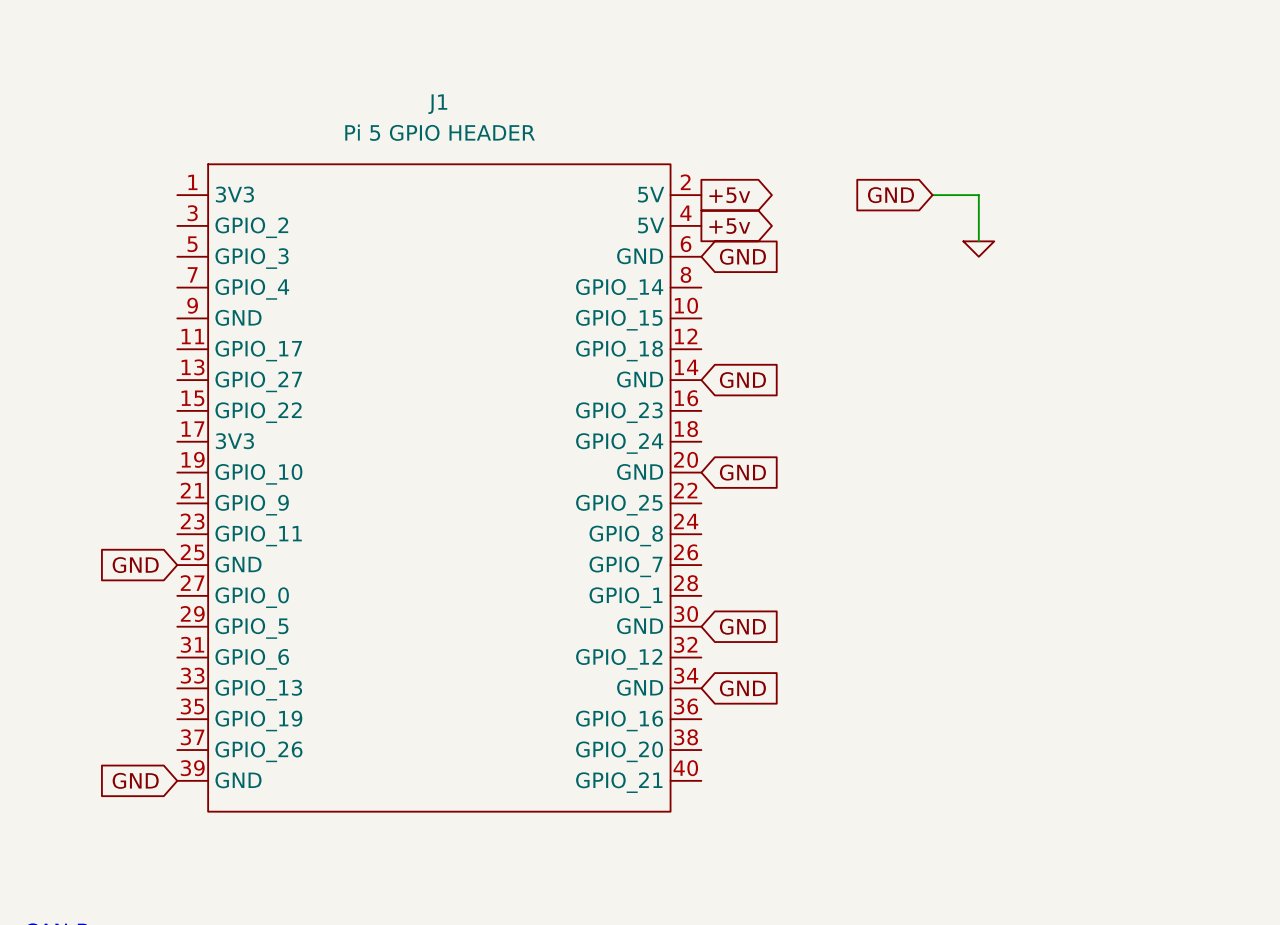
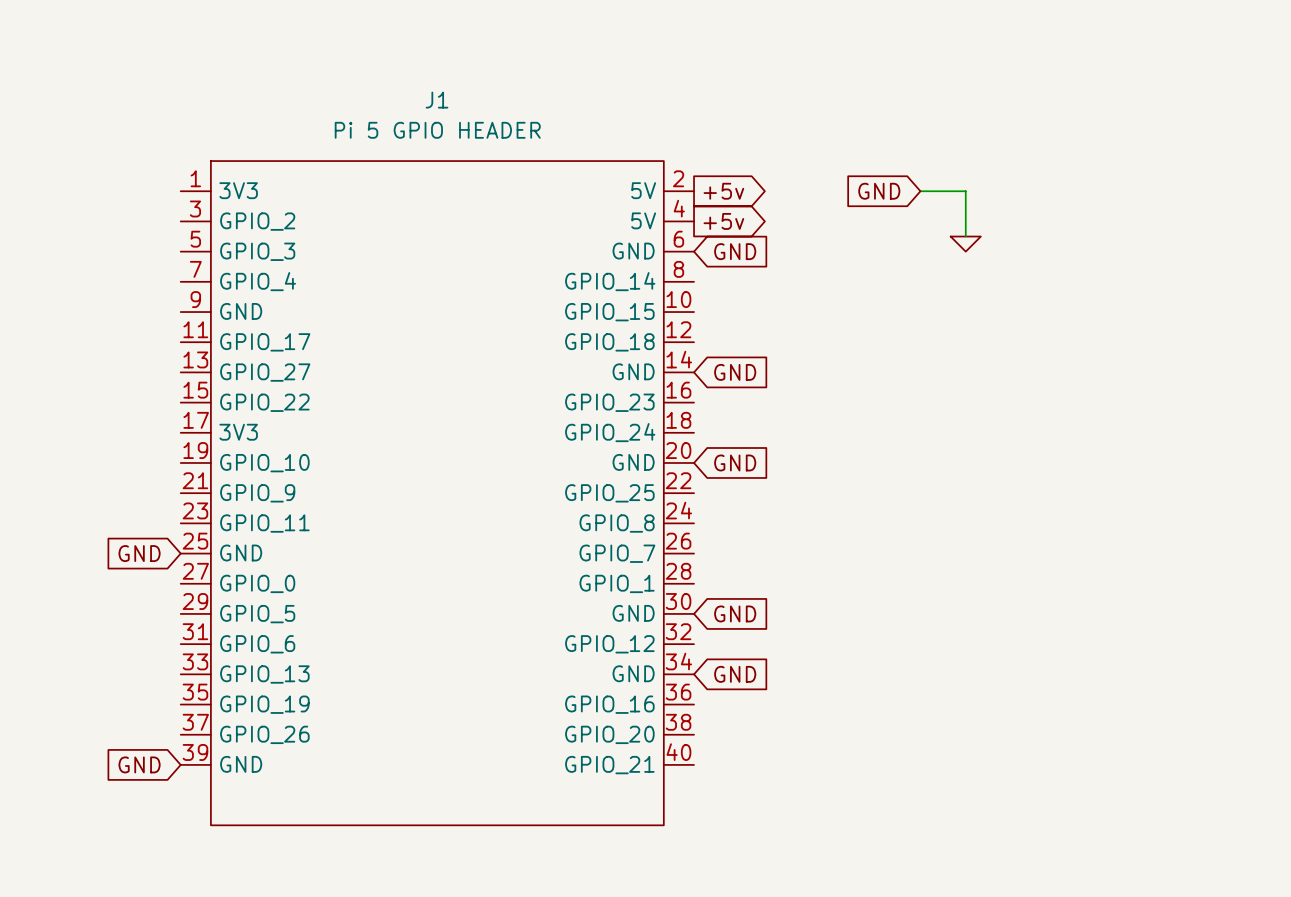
J1 symbol: [177, 164, 702, 812] -> [180, 161, 695, 826]

